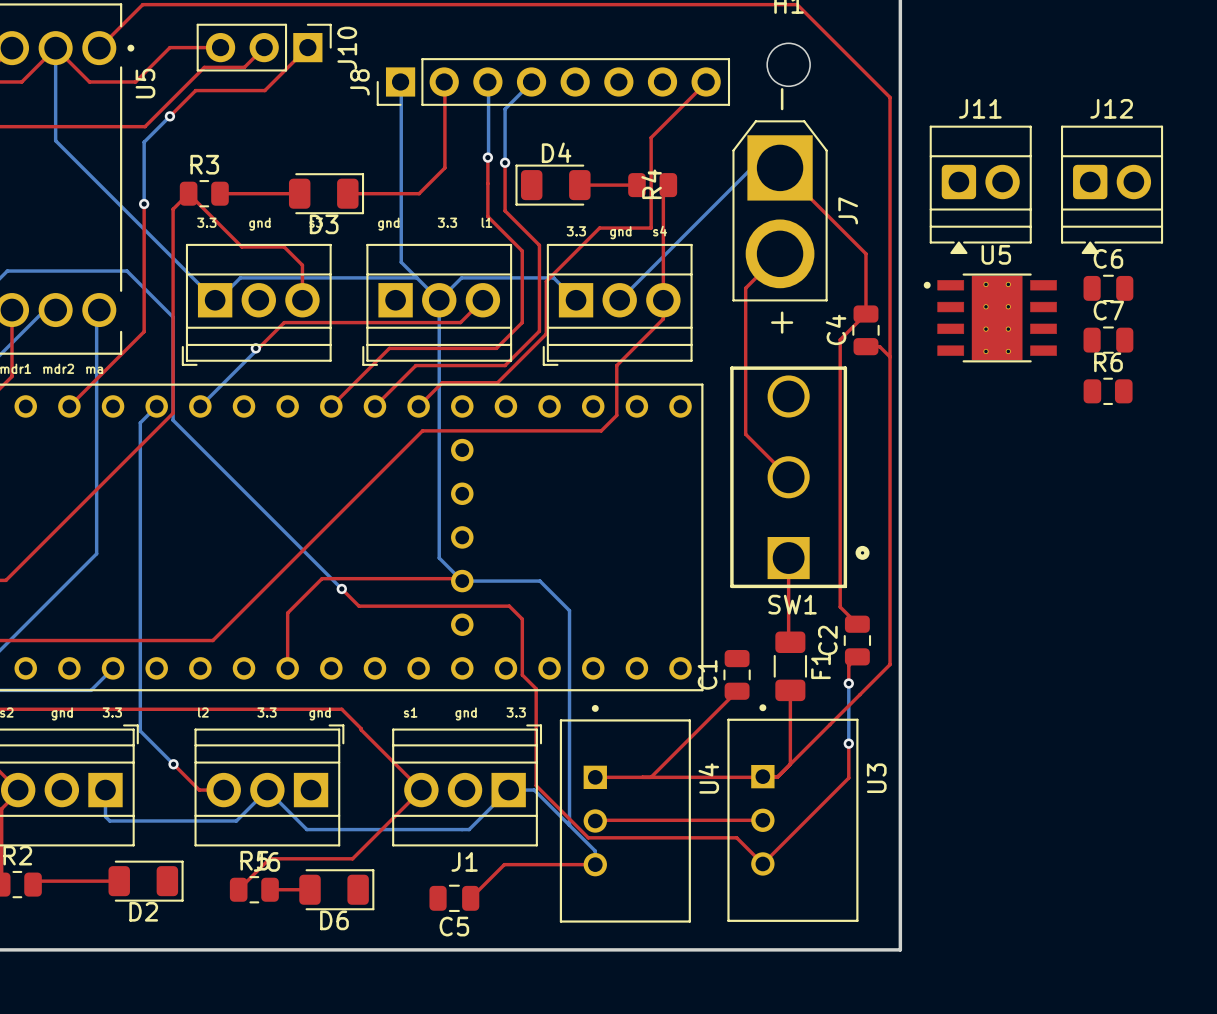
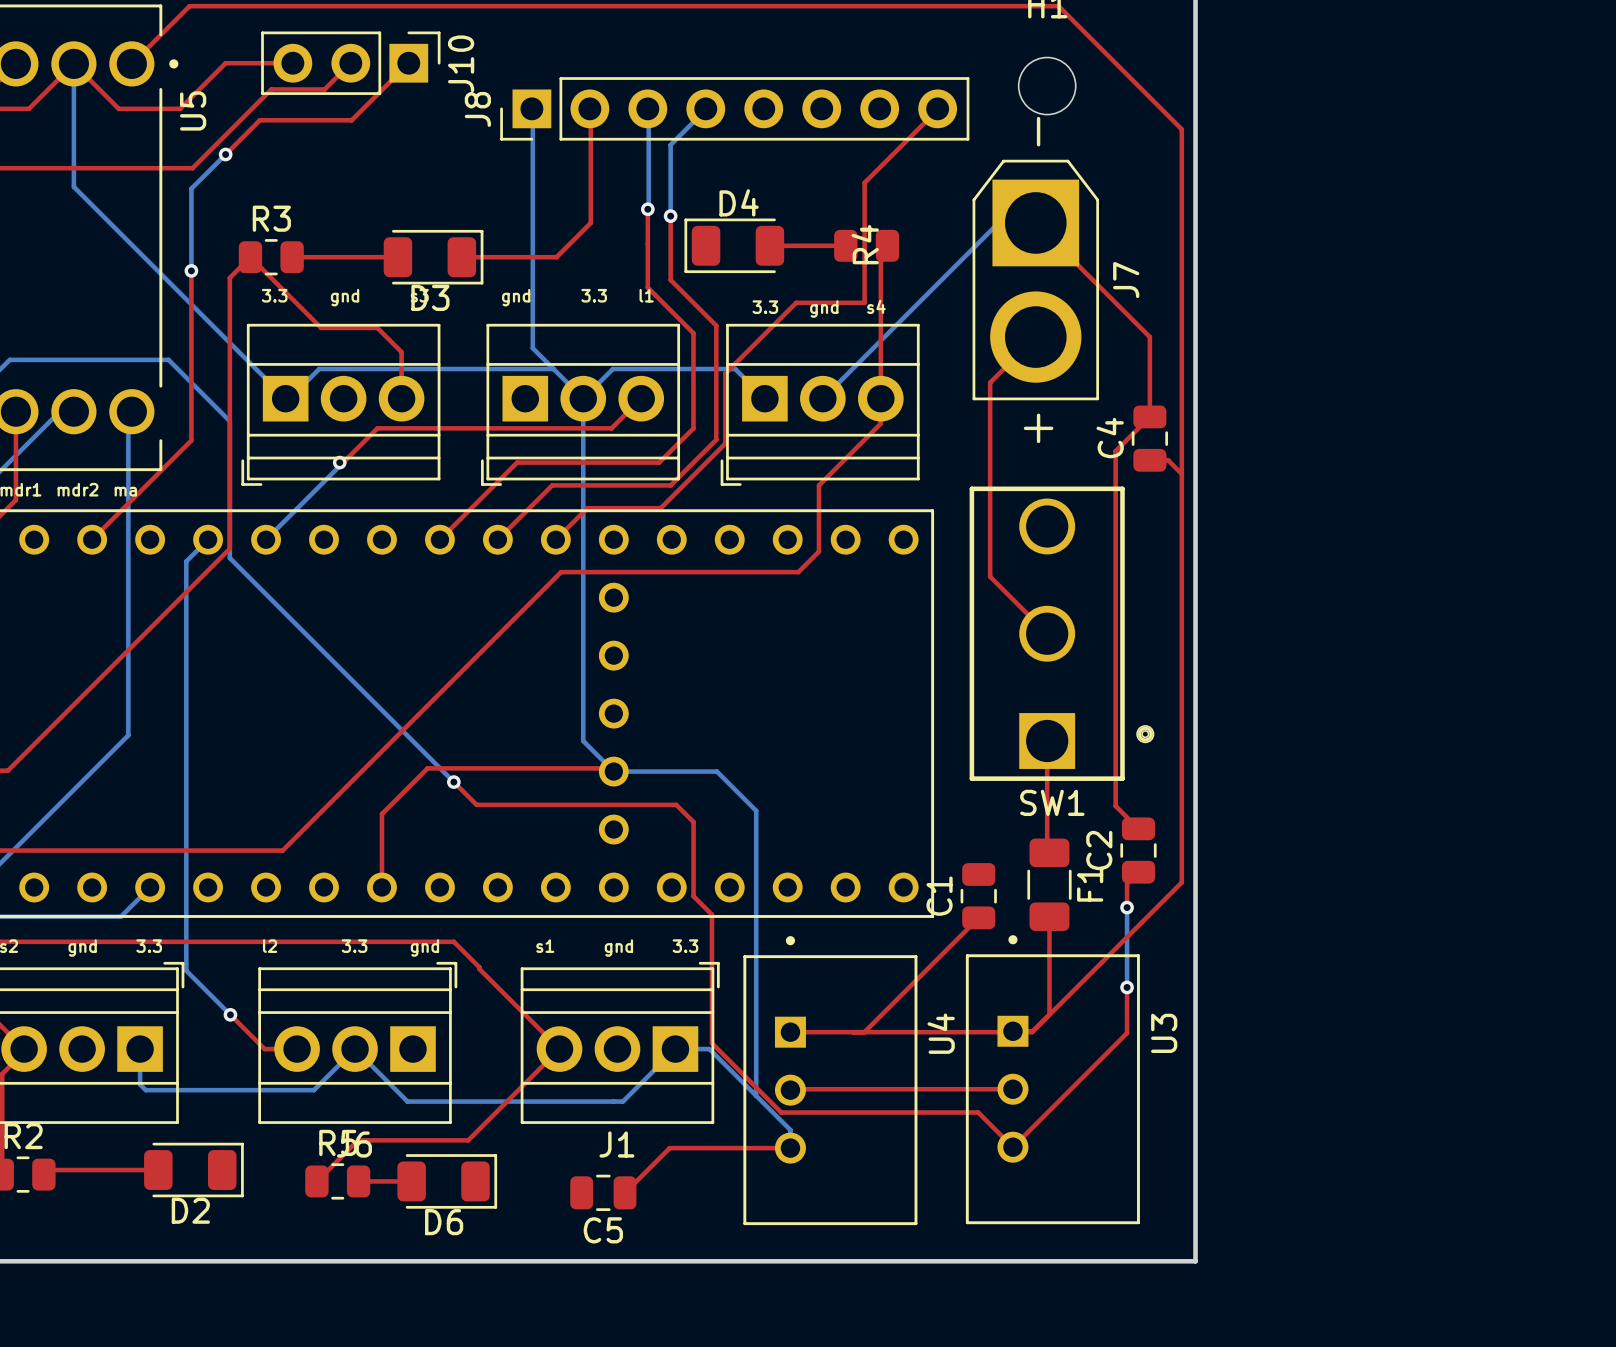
J11: (980, 189) -> none
J12: (1112, 189) -> none
C6: (1108, 288) -> none
U5: (990, 317) -> none
C7: (1108, 340) -> none
R6: (1108, 391) -> none

